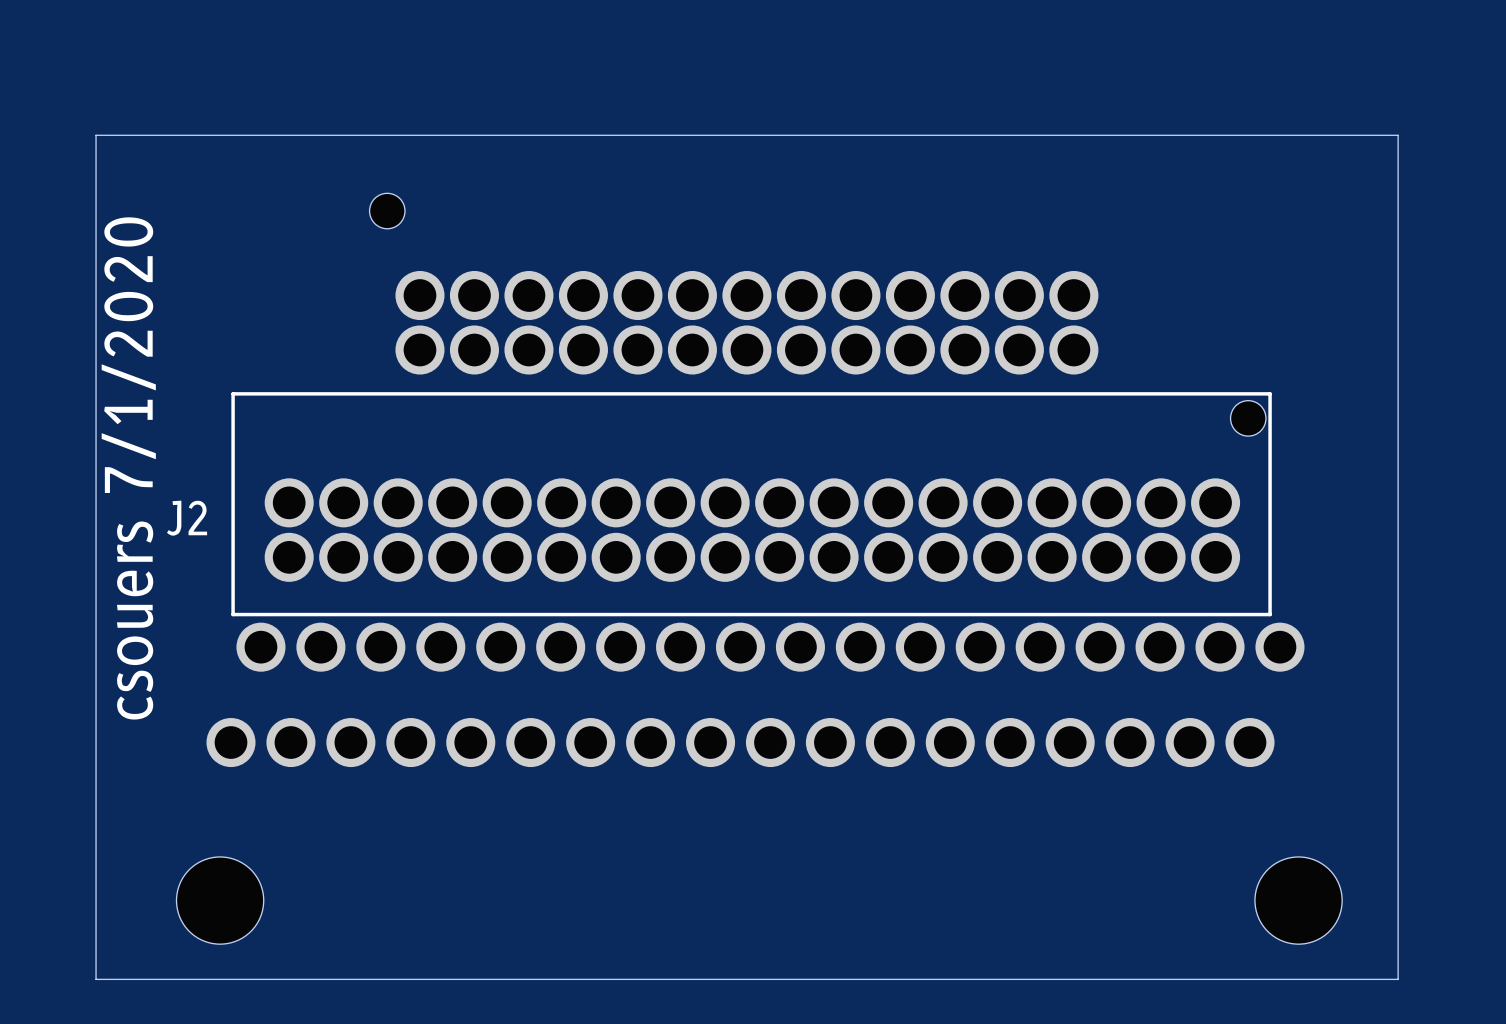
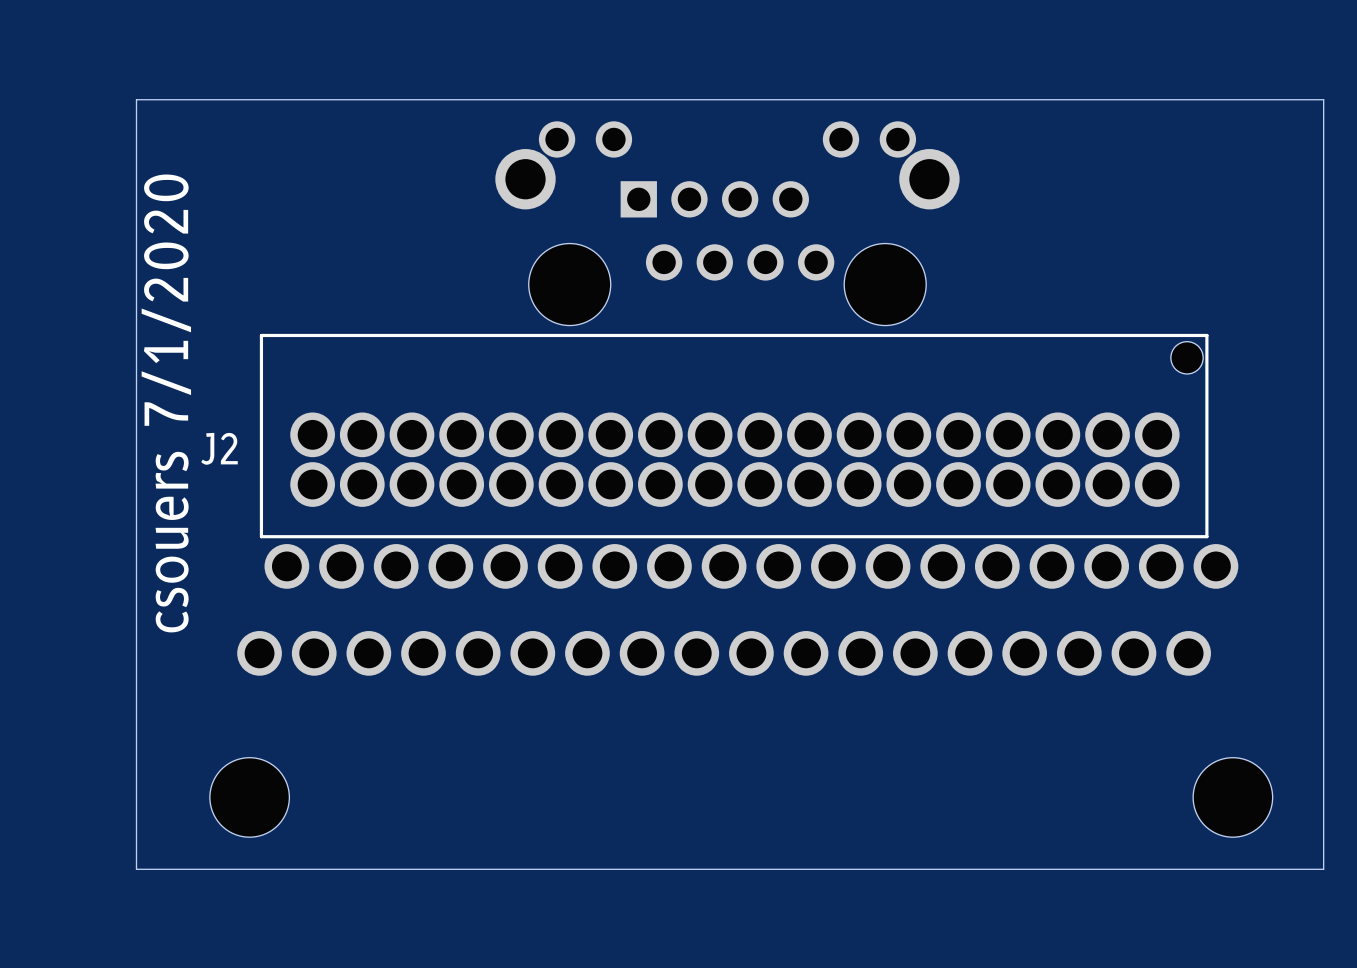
part footprint: [369, 193, 1099, 375] -> [495, 121, 960, 326]

